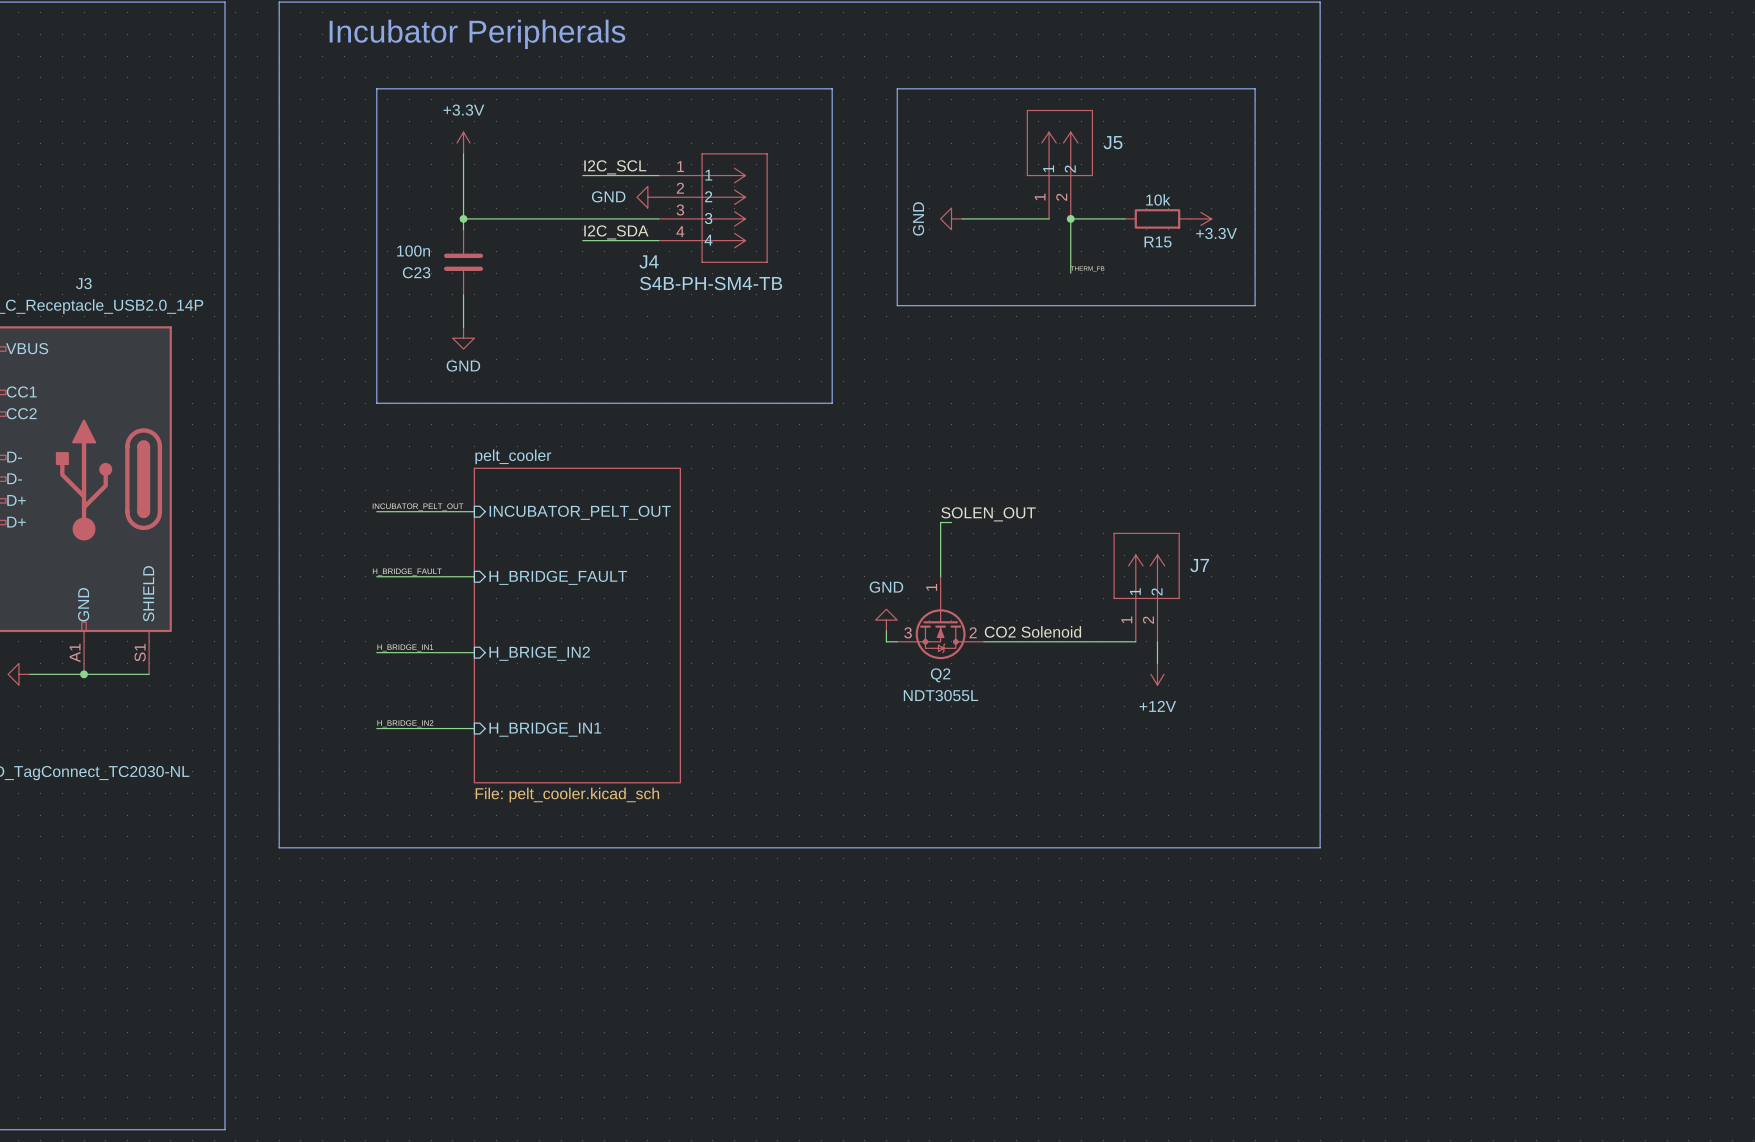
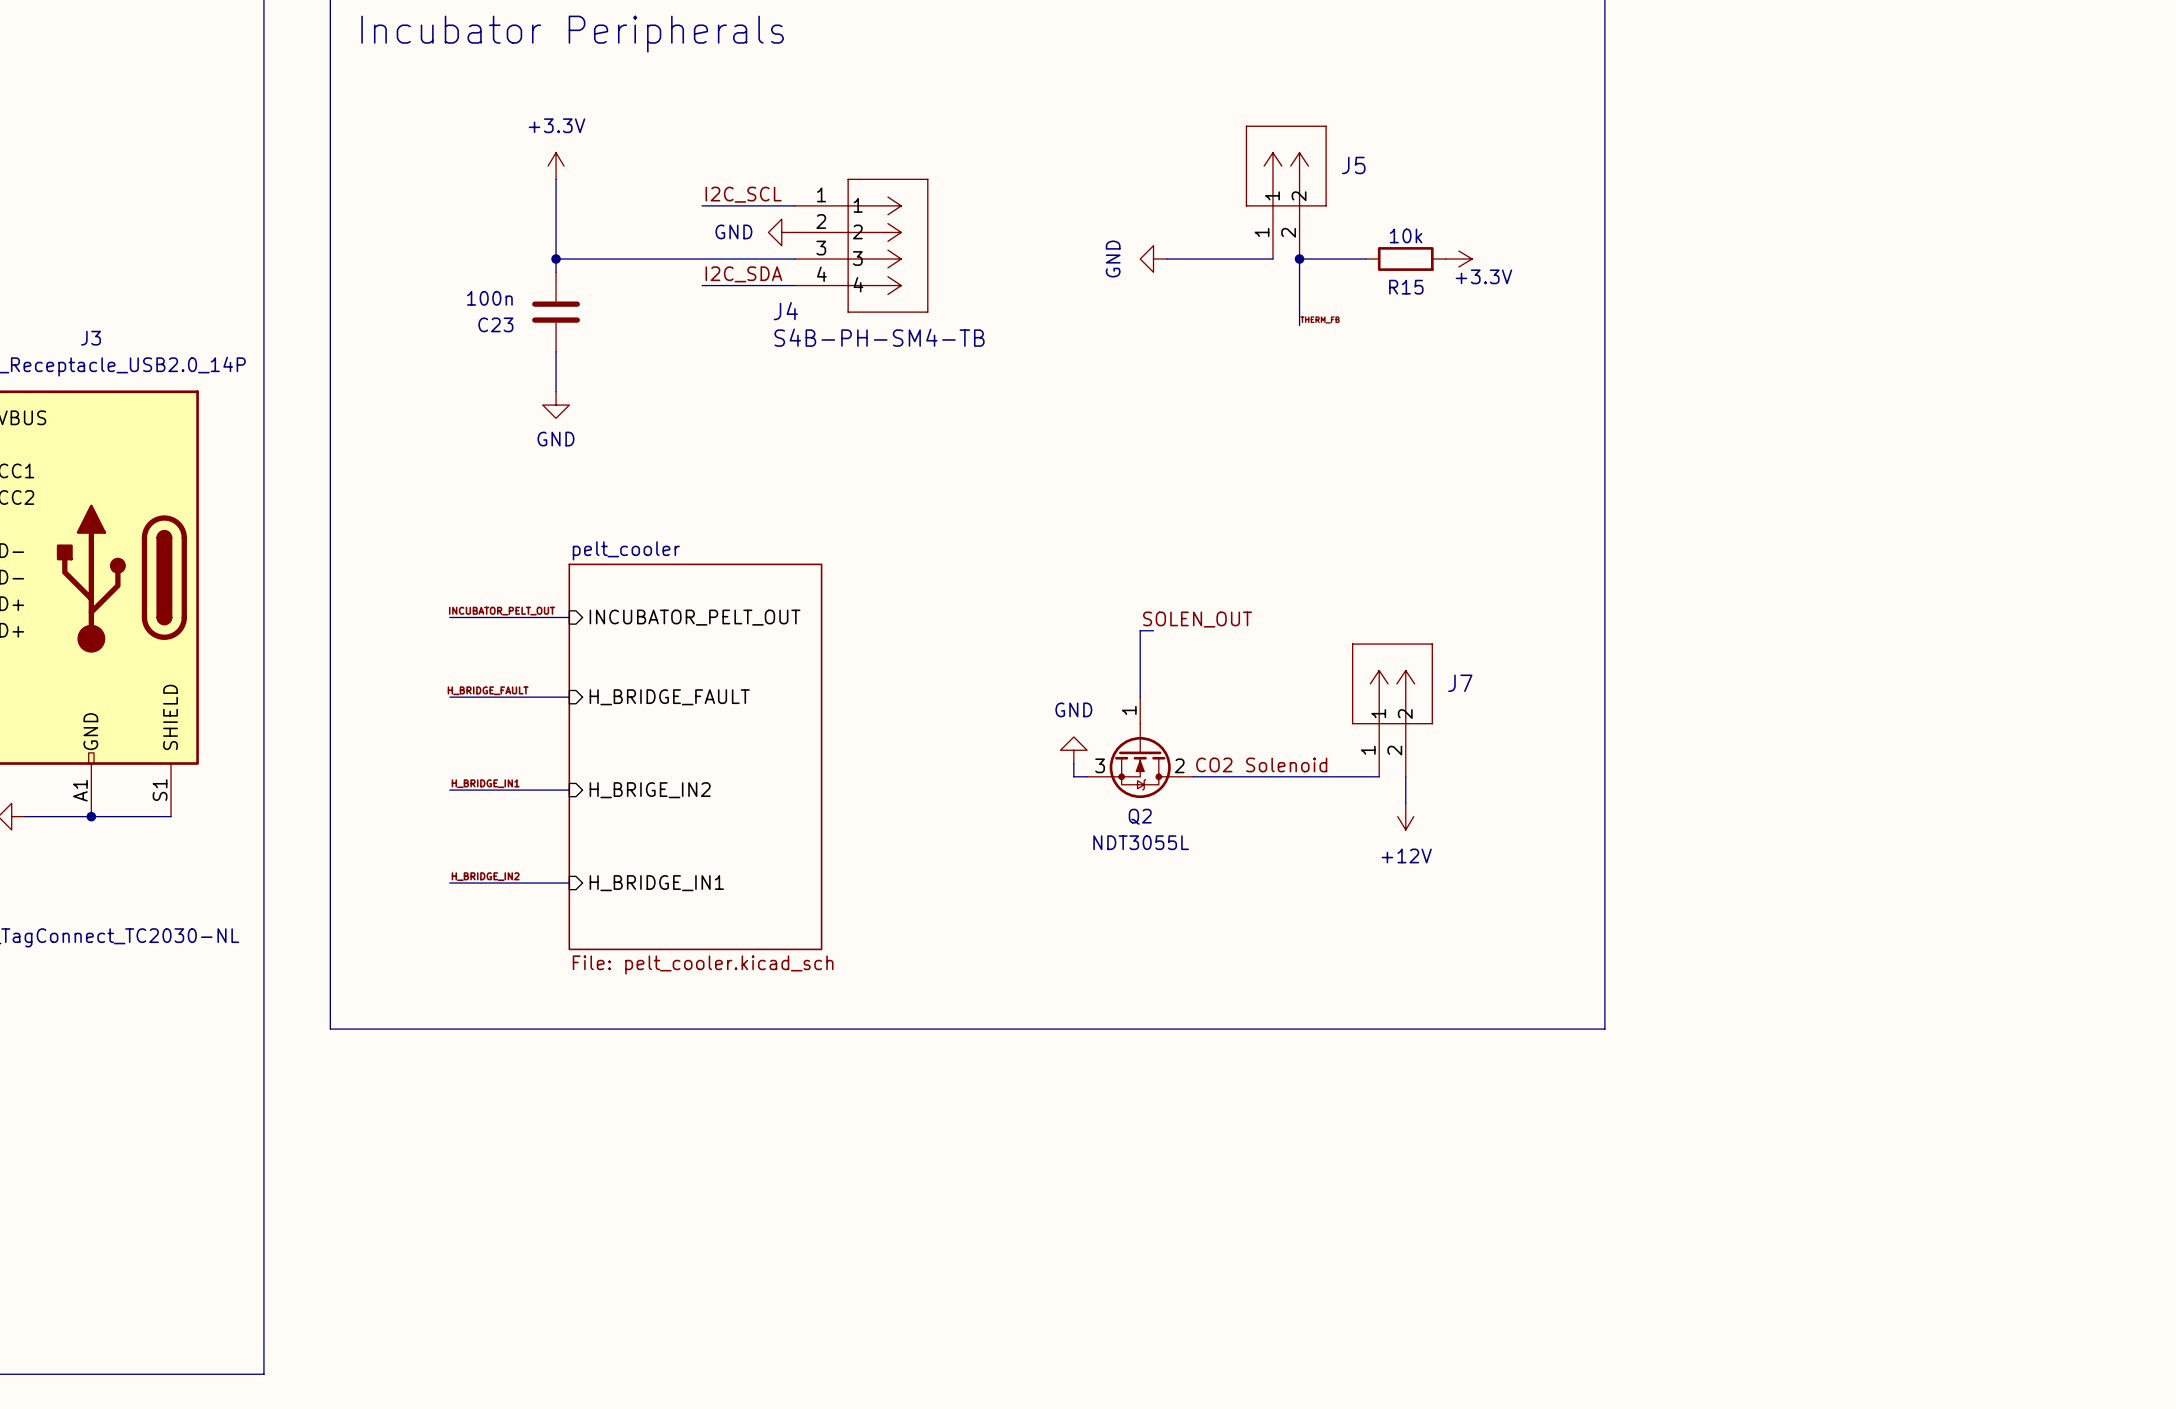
line: (376, 88) (376, 403) (832, 403) (832, 88) (376, 88) -> none
line: (897, 88) (897, 305) (1255, 305) (1255, 88) (897, 88) -> none

